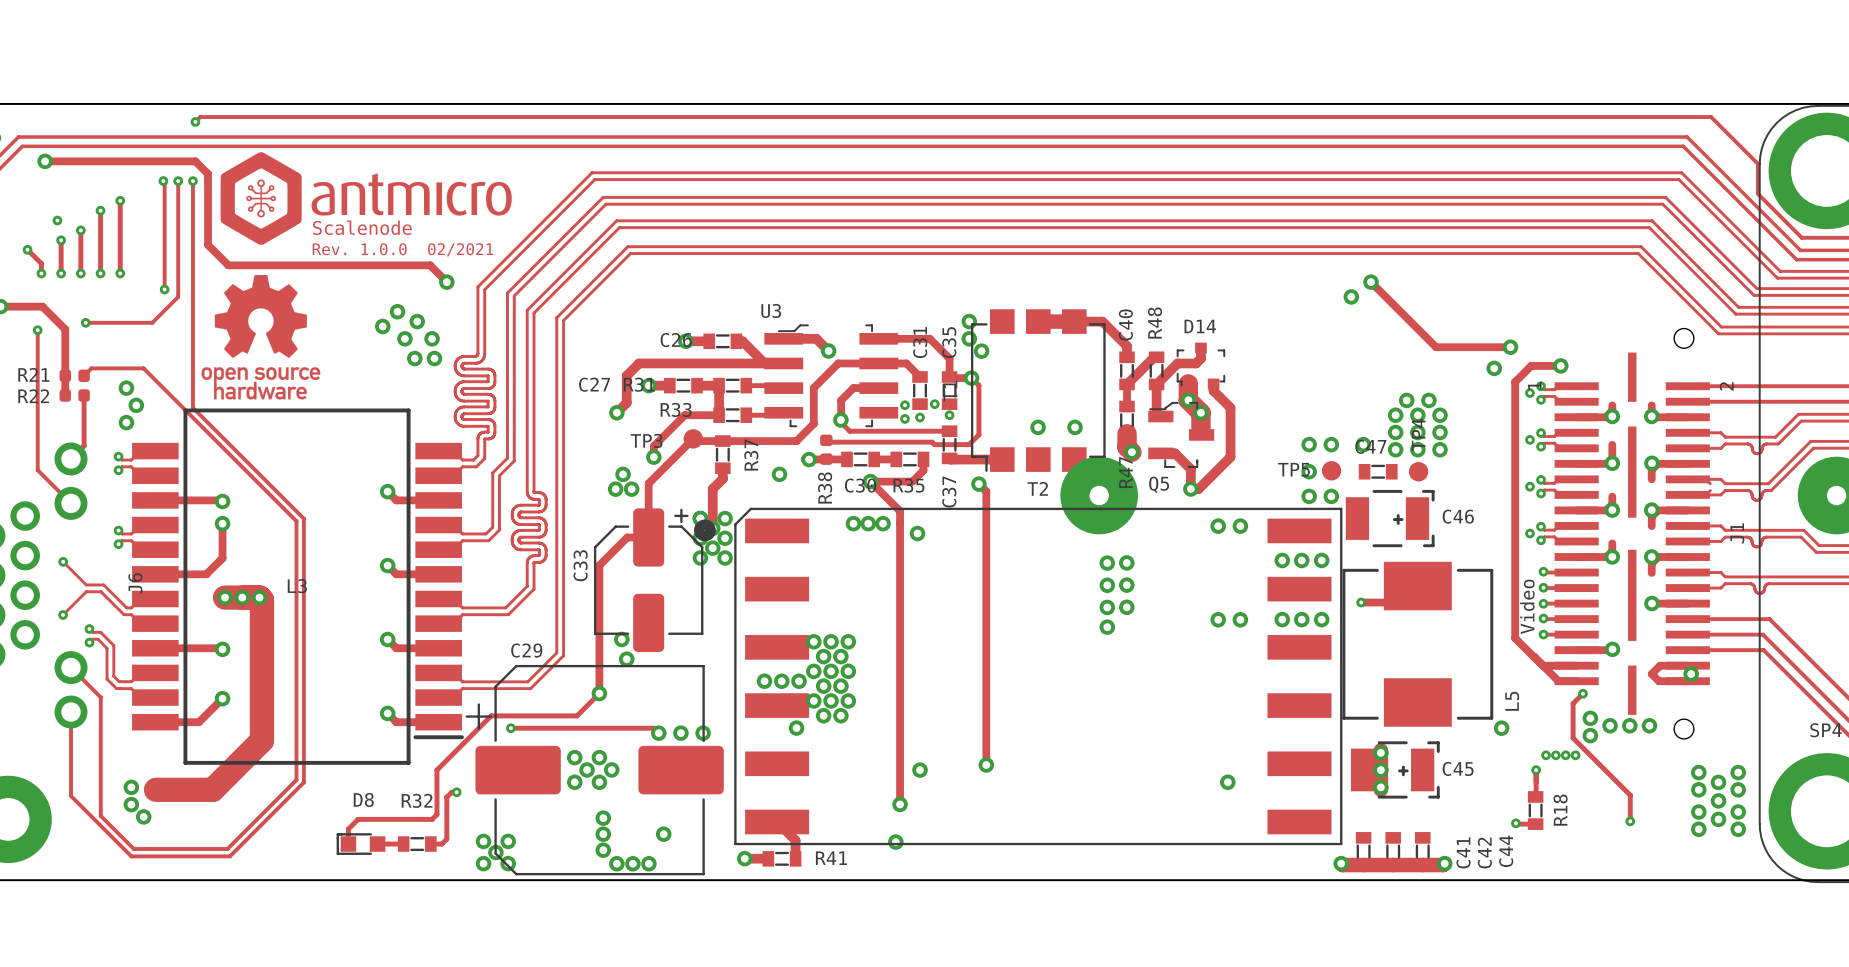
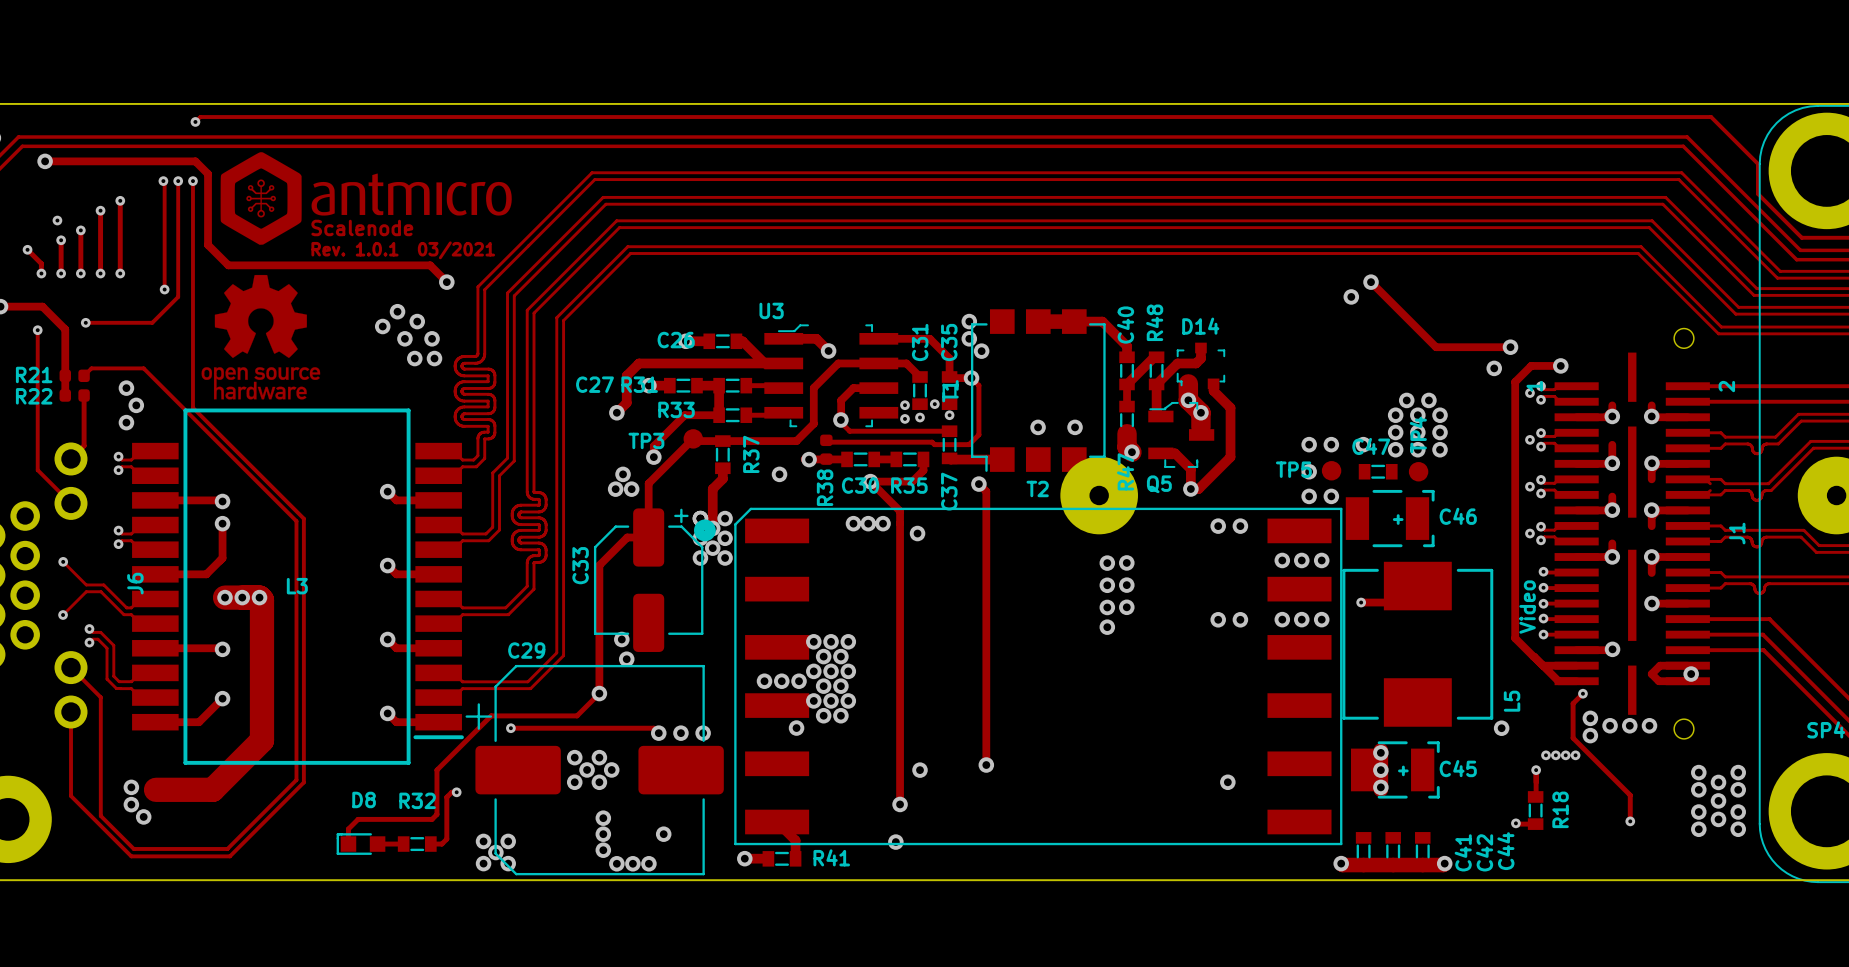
text: Rev. 1.0.0 02/2021 (402, 249) -> Rev. 1.0.1 03/2021 (403, 250)

